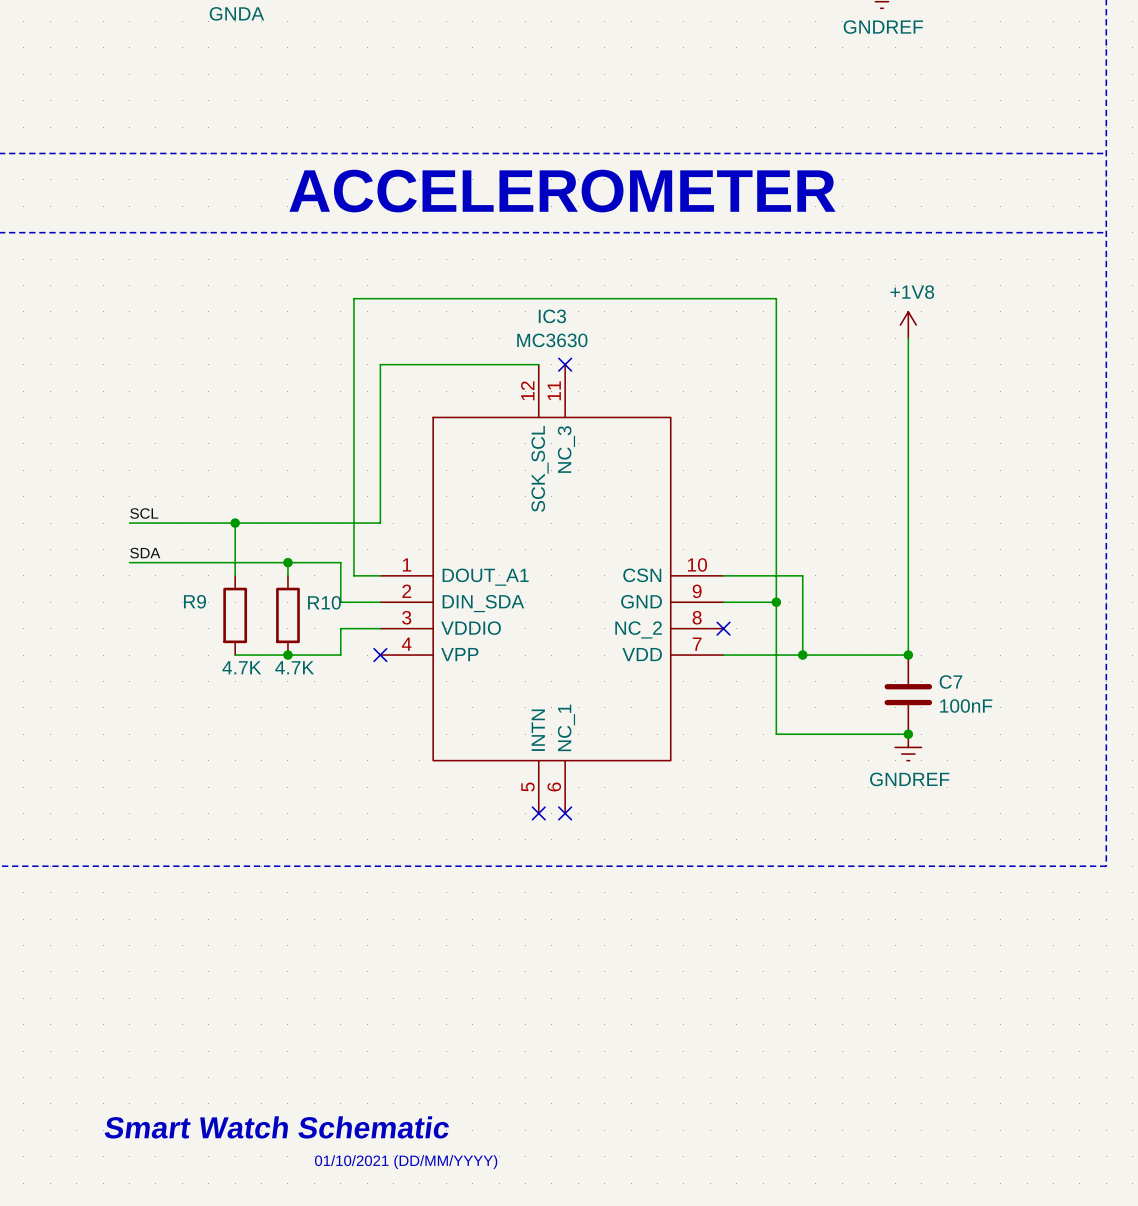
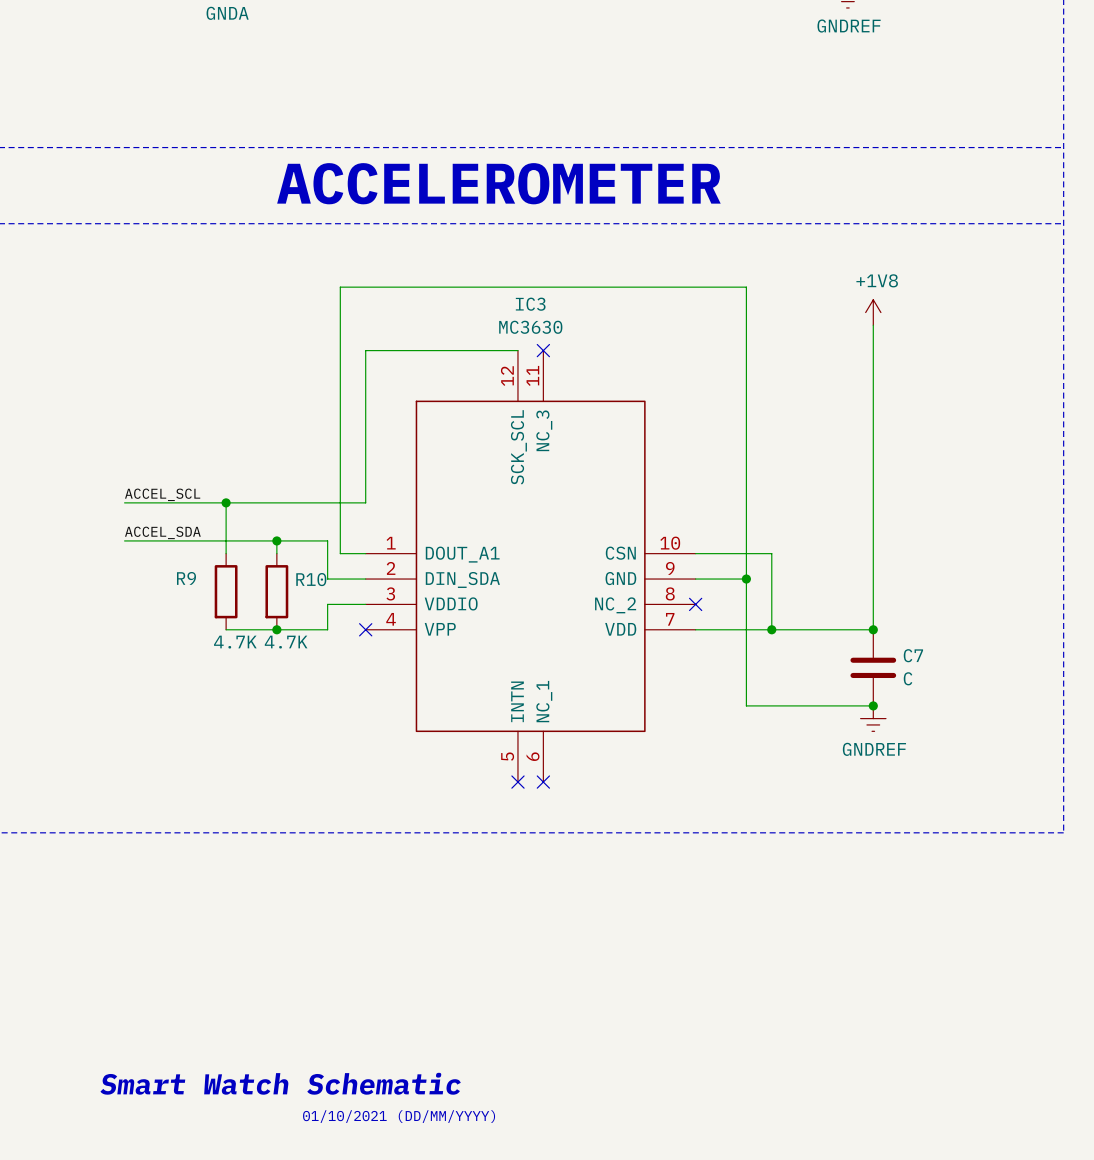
label: SCL (144, 513) -> ACCEL_SCL (162, 494)
label: SDA (145, 553) -> ACCEL_SDA (162, 532)
C7 value: 100nF (966, 706) -> C (908, 678)

